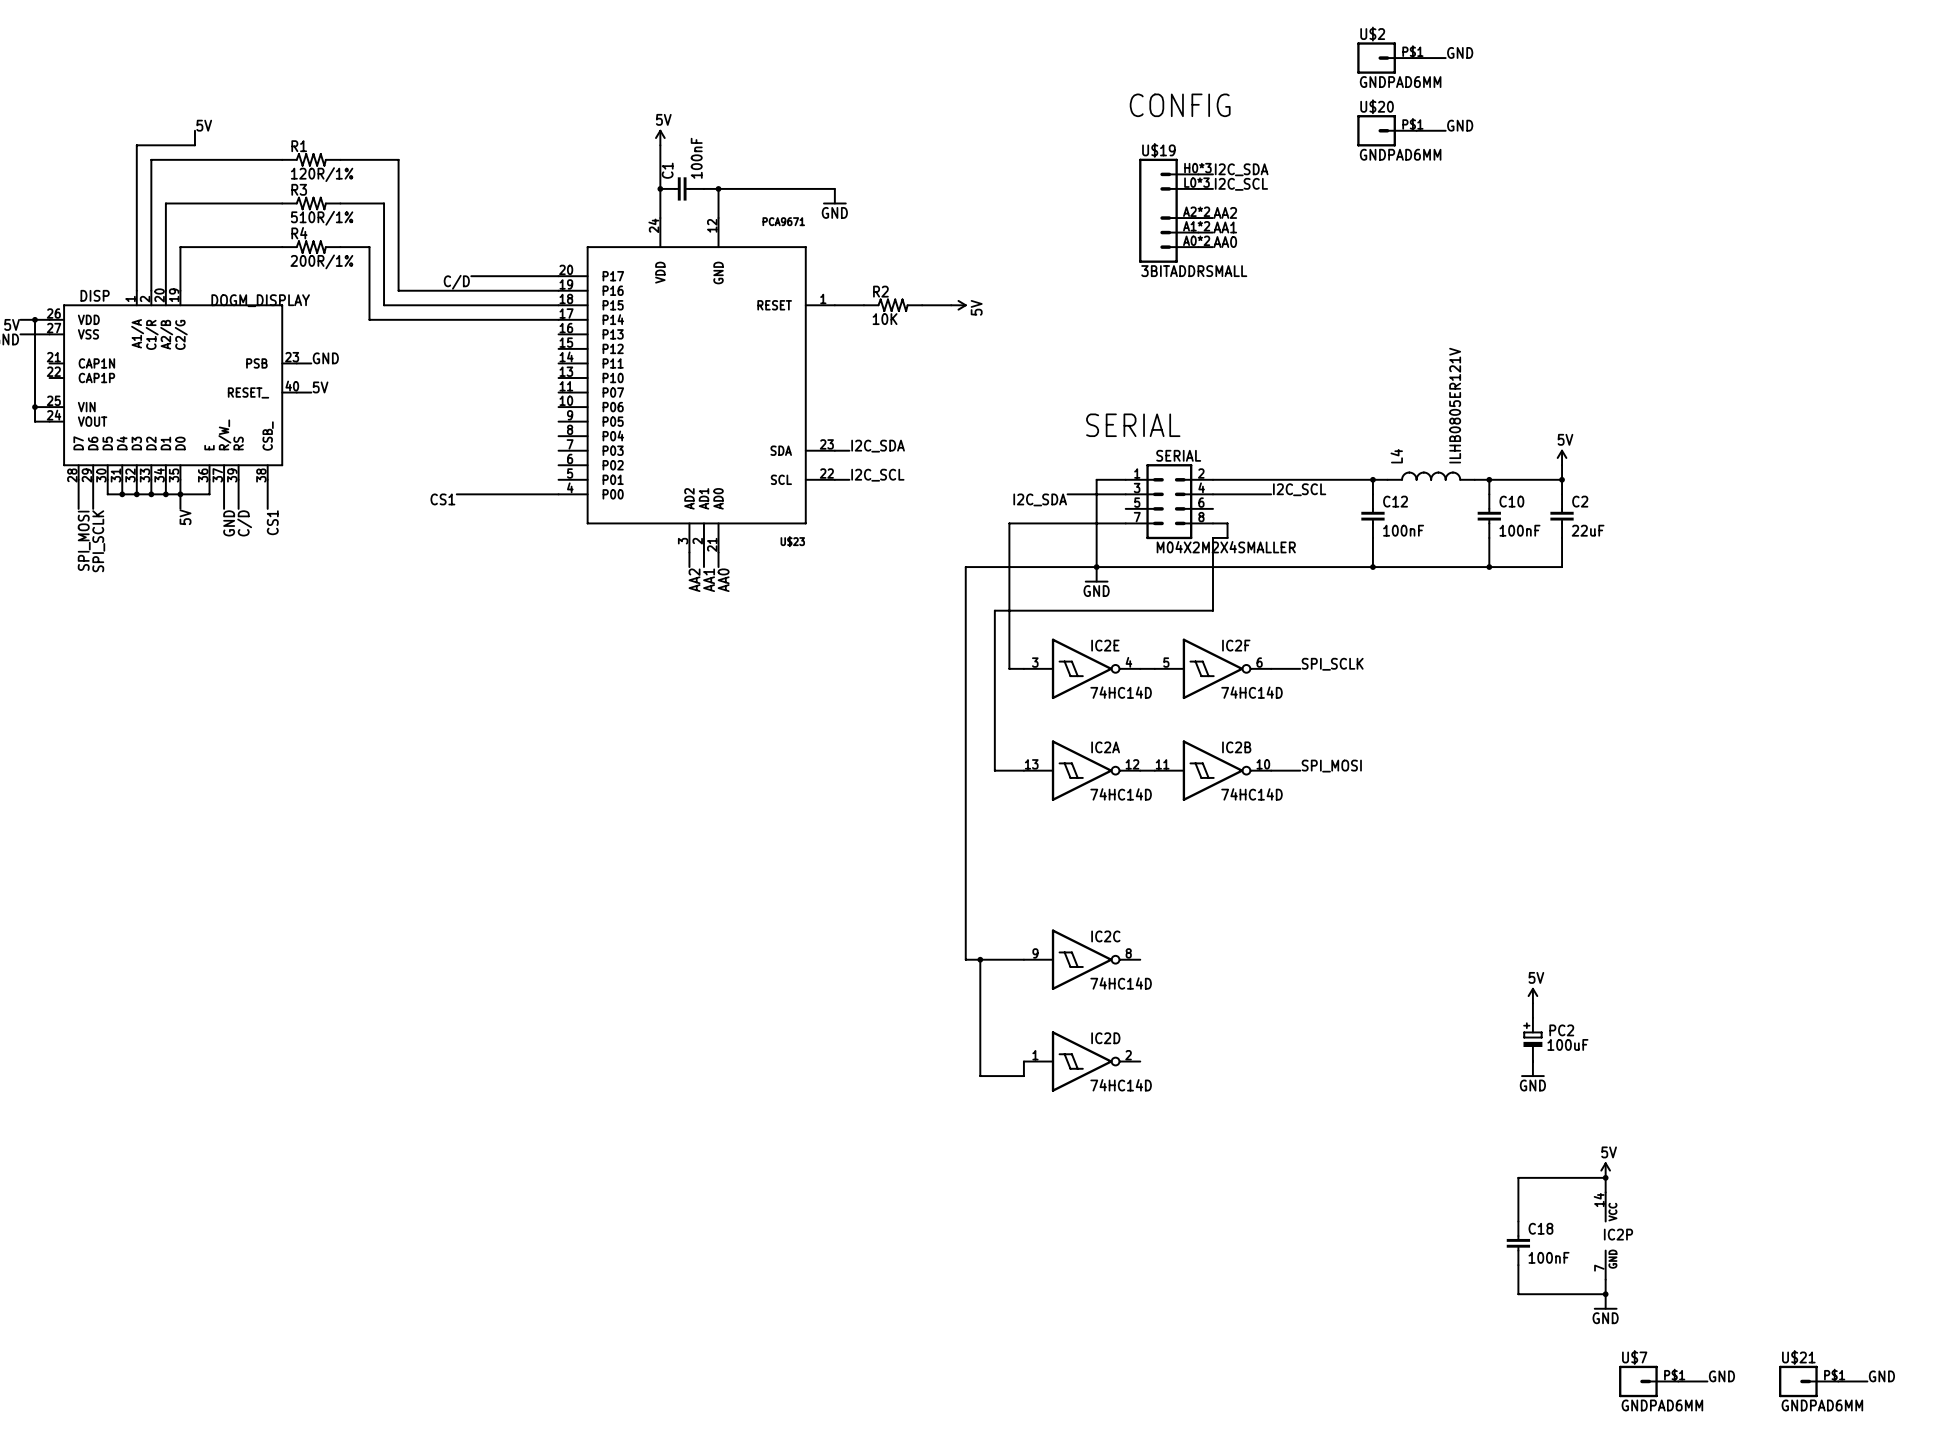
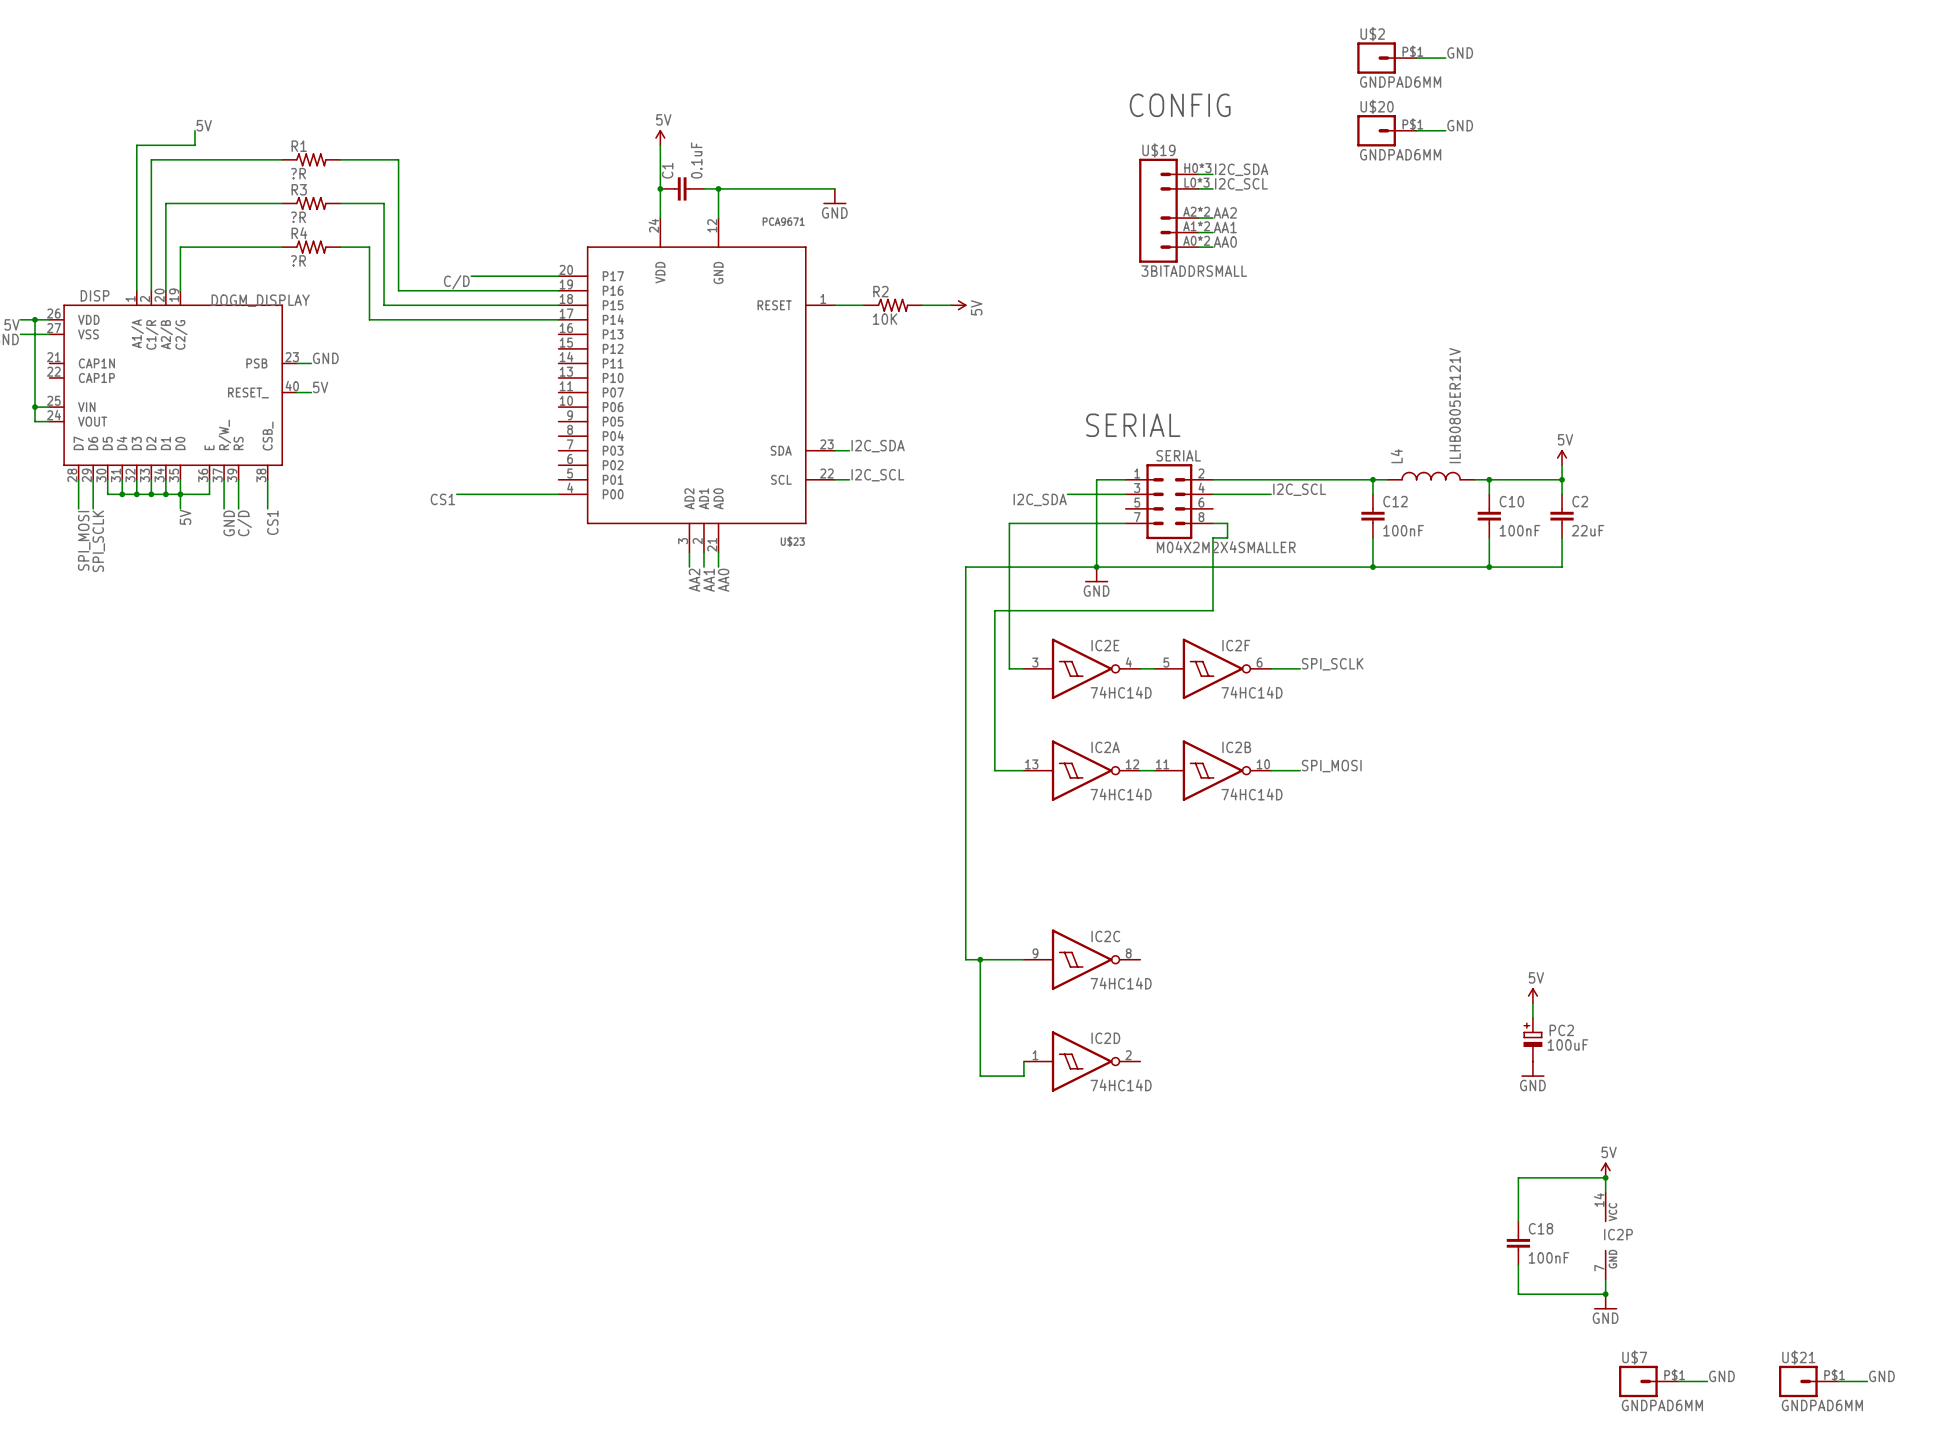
C1 value: 100nF (696, 158) -> 0.1uF (696, 160)
R1 value: 120R/1% (322, 174) -> ?R (298, 173)
R3 value: 510R/1% (322, 218) -> ?R (298, 217)
R4 value: 200R/1% (321, 261) -> ?R (298, 260)

